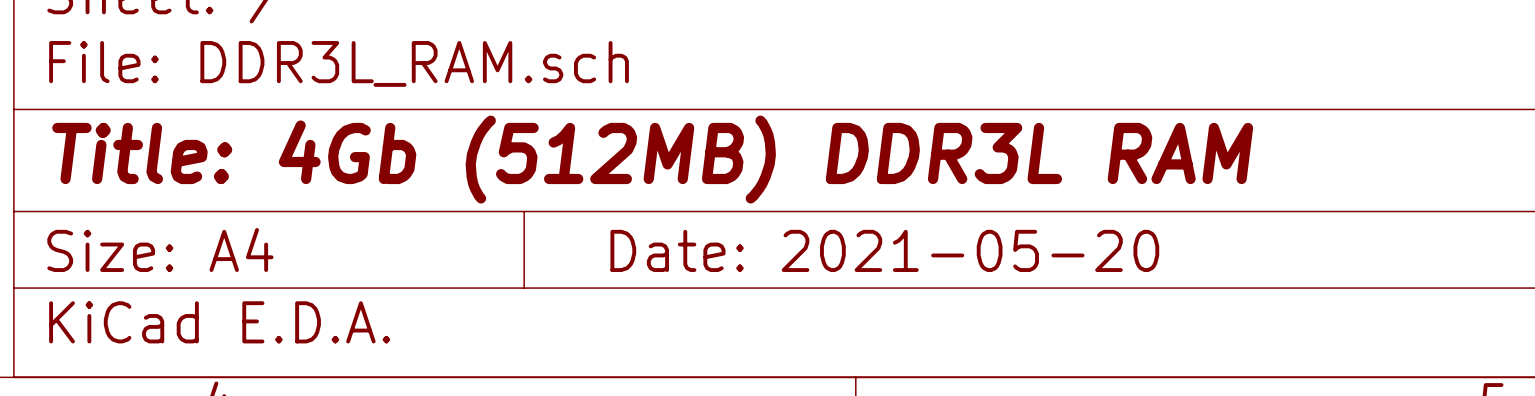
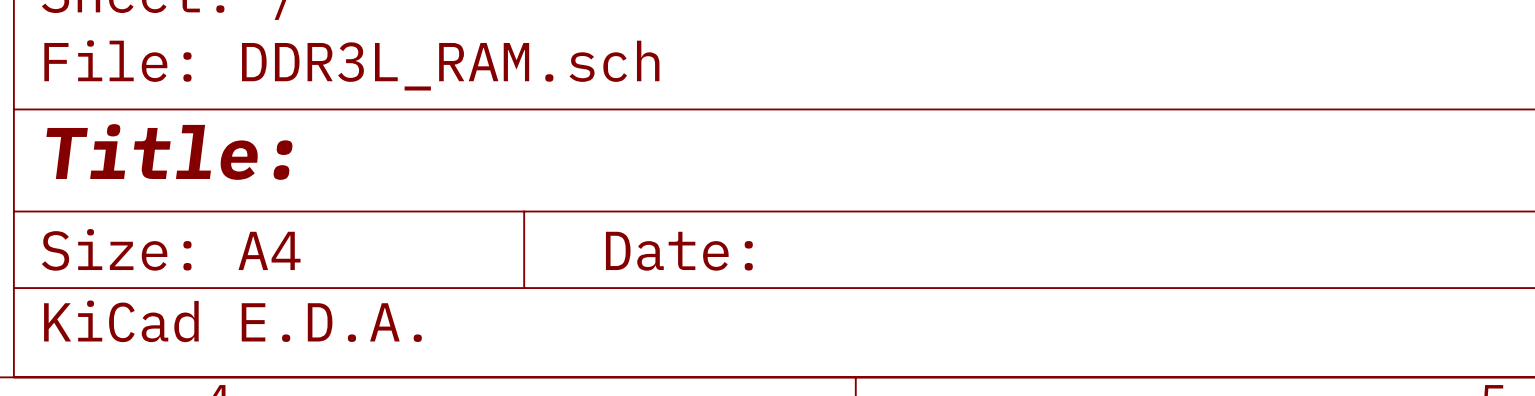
title block: Title: 4Gb (512MB) DDR3L RAM (652, 159) -> Title: (169, 151)
title block: Date: 2021-05-20 (884, 250) -> Date: (679, 251)

